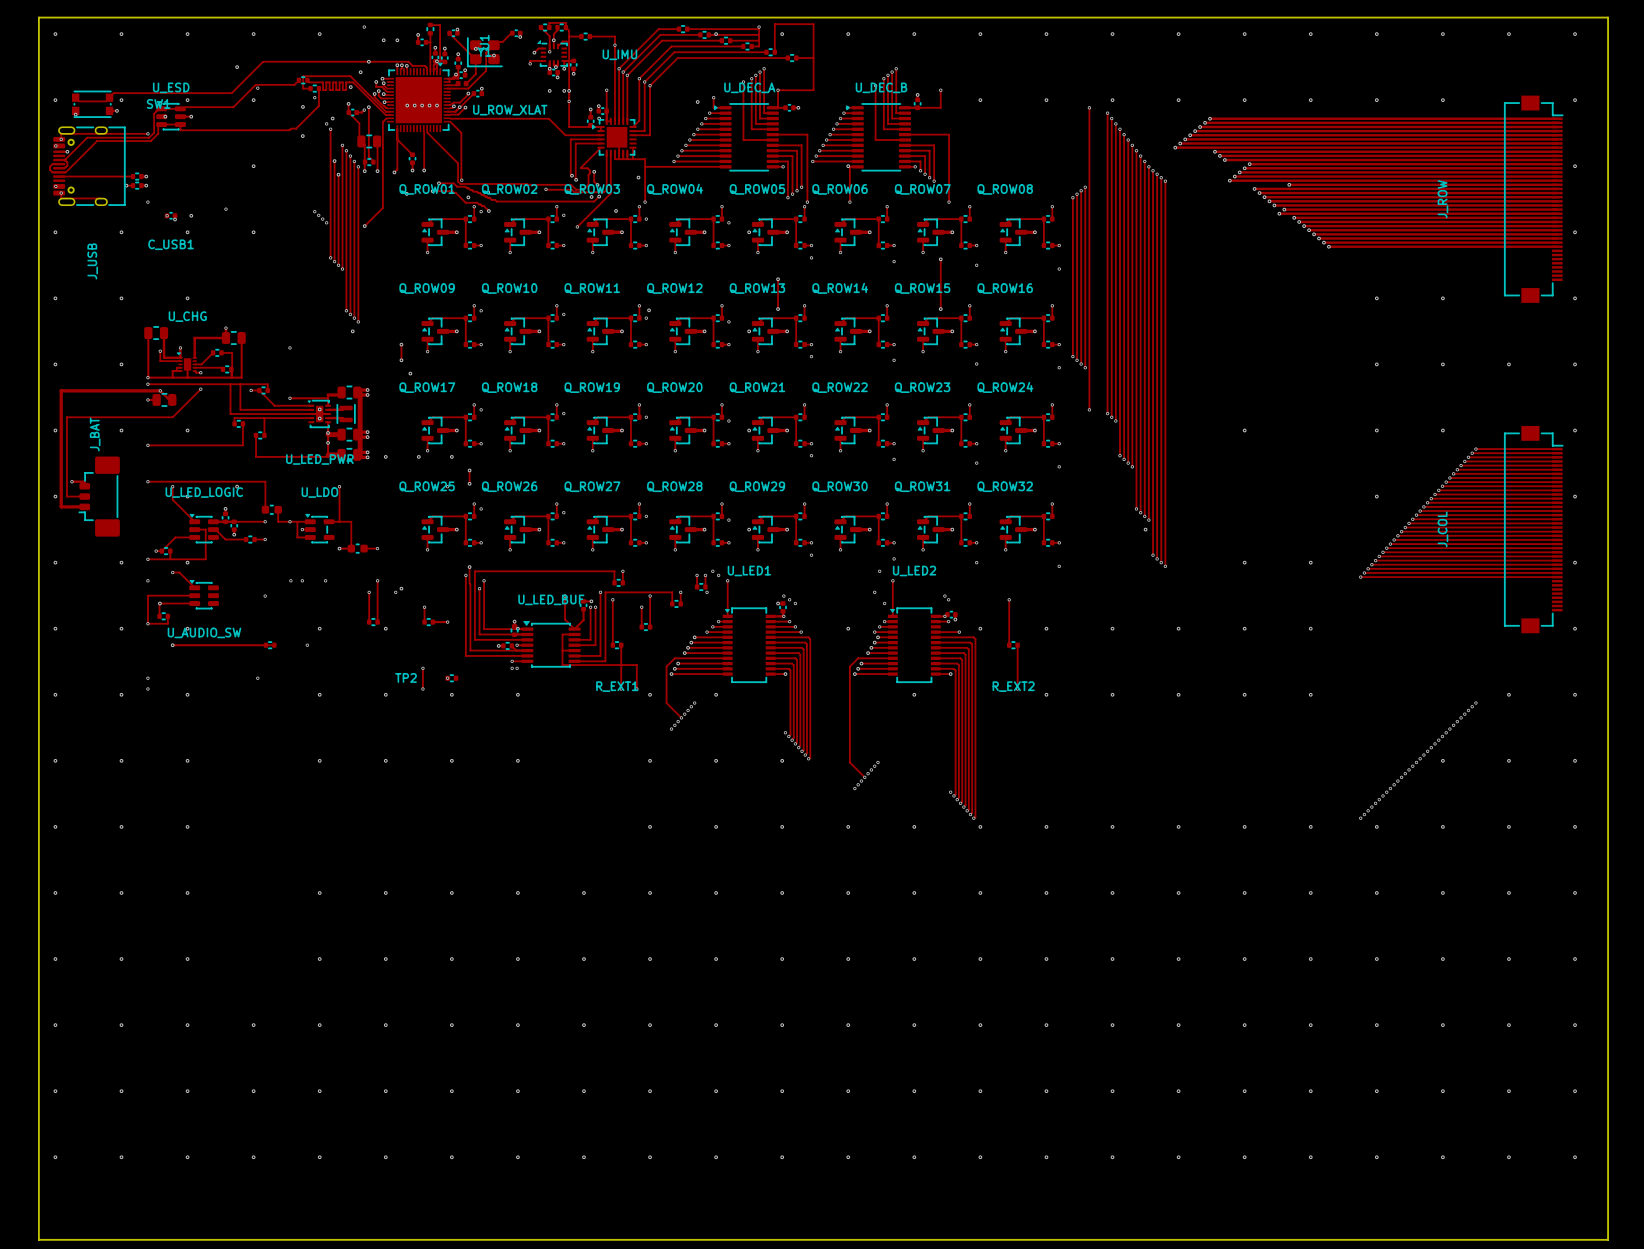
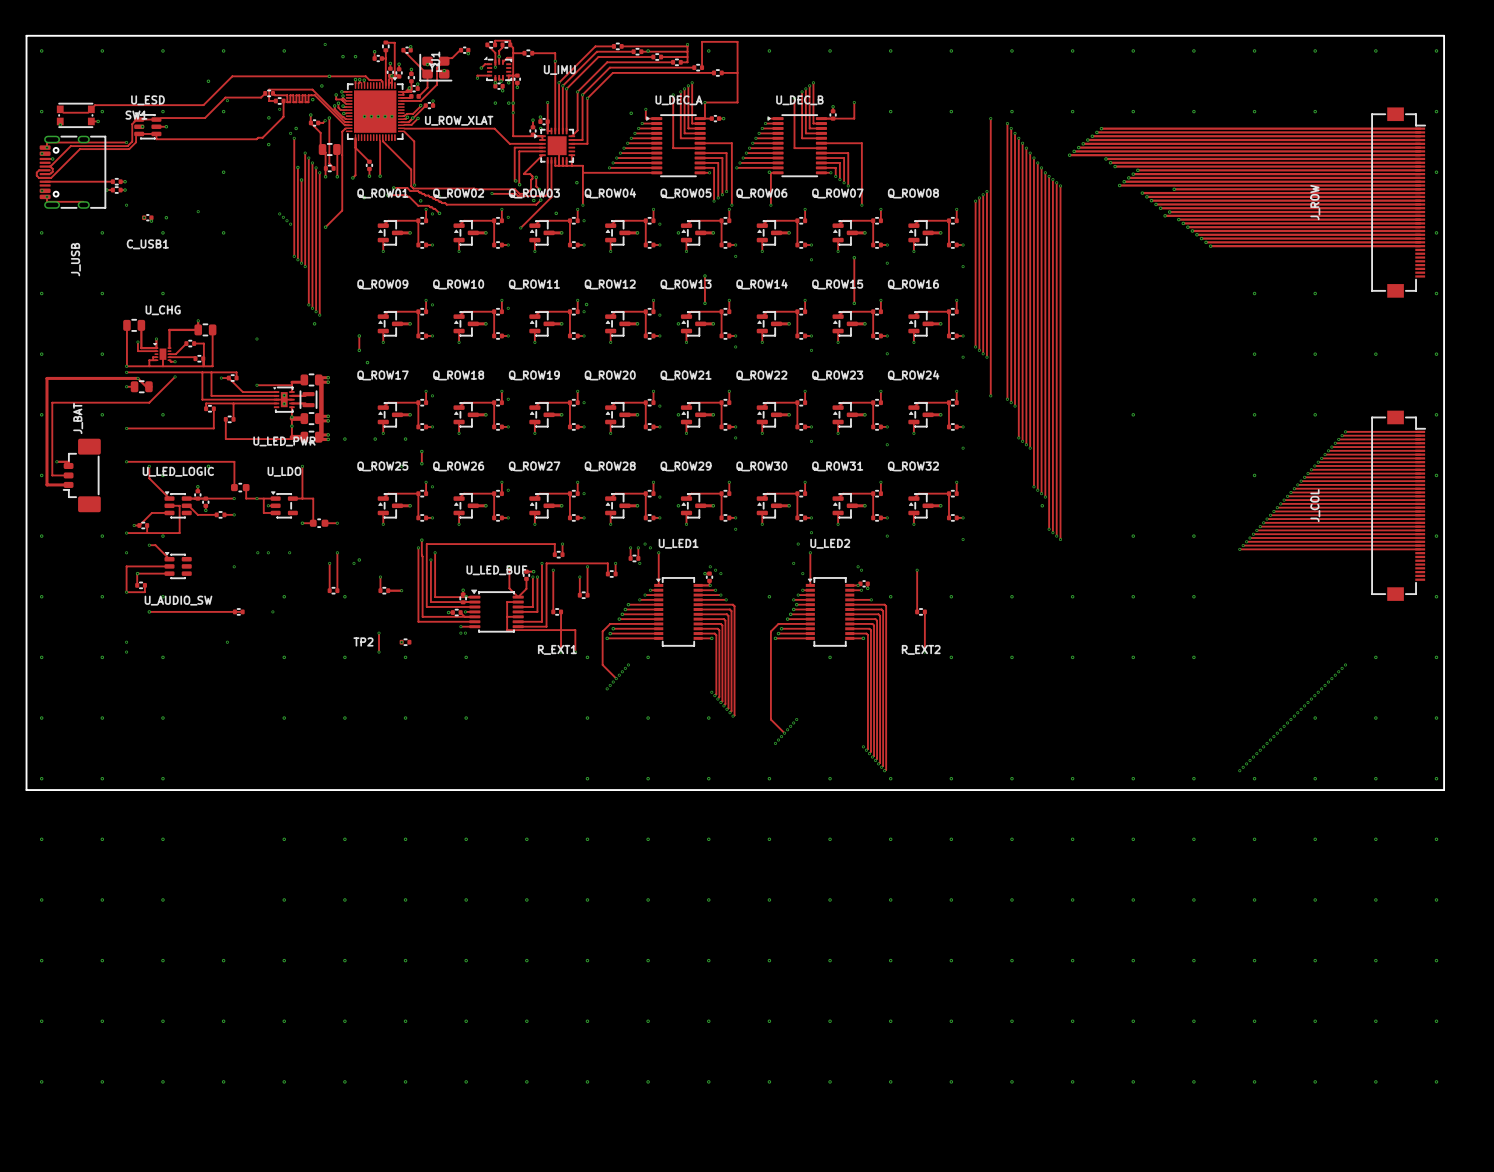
board edge: (1583, 17) (1608, 17) (1608, 1239) (38, 1239) (38, 839) -> (1444, 35) (1444, 790) (26, 790)

